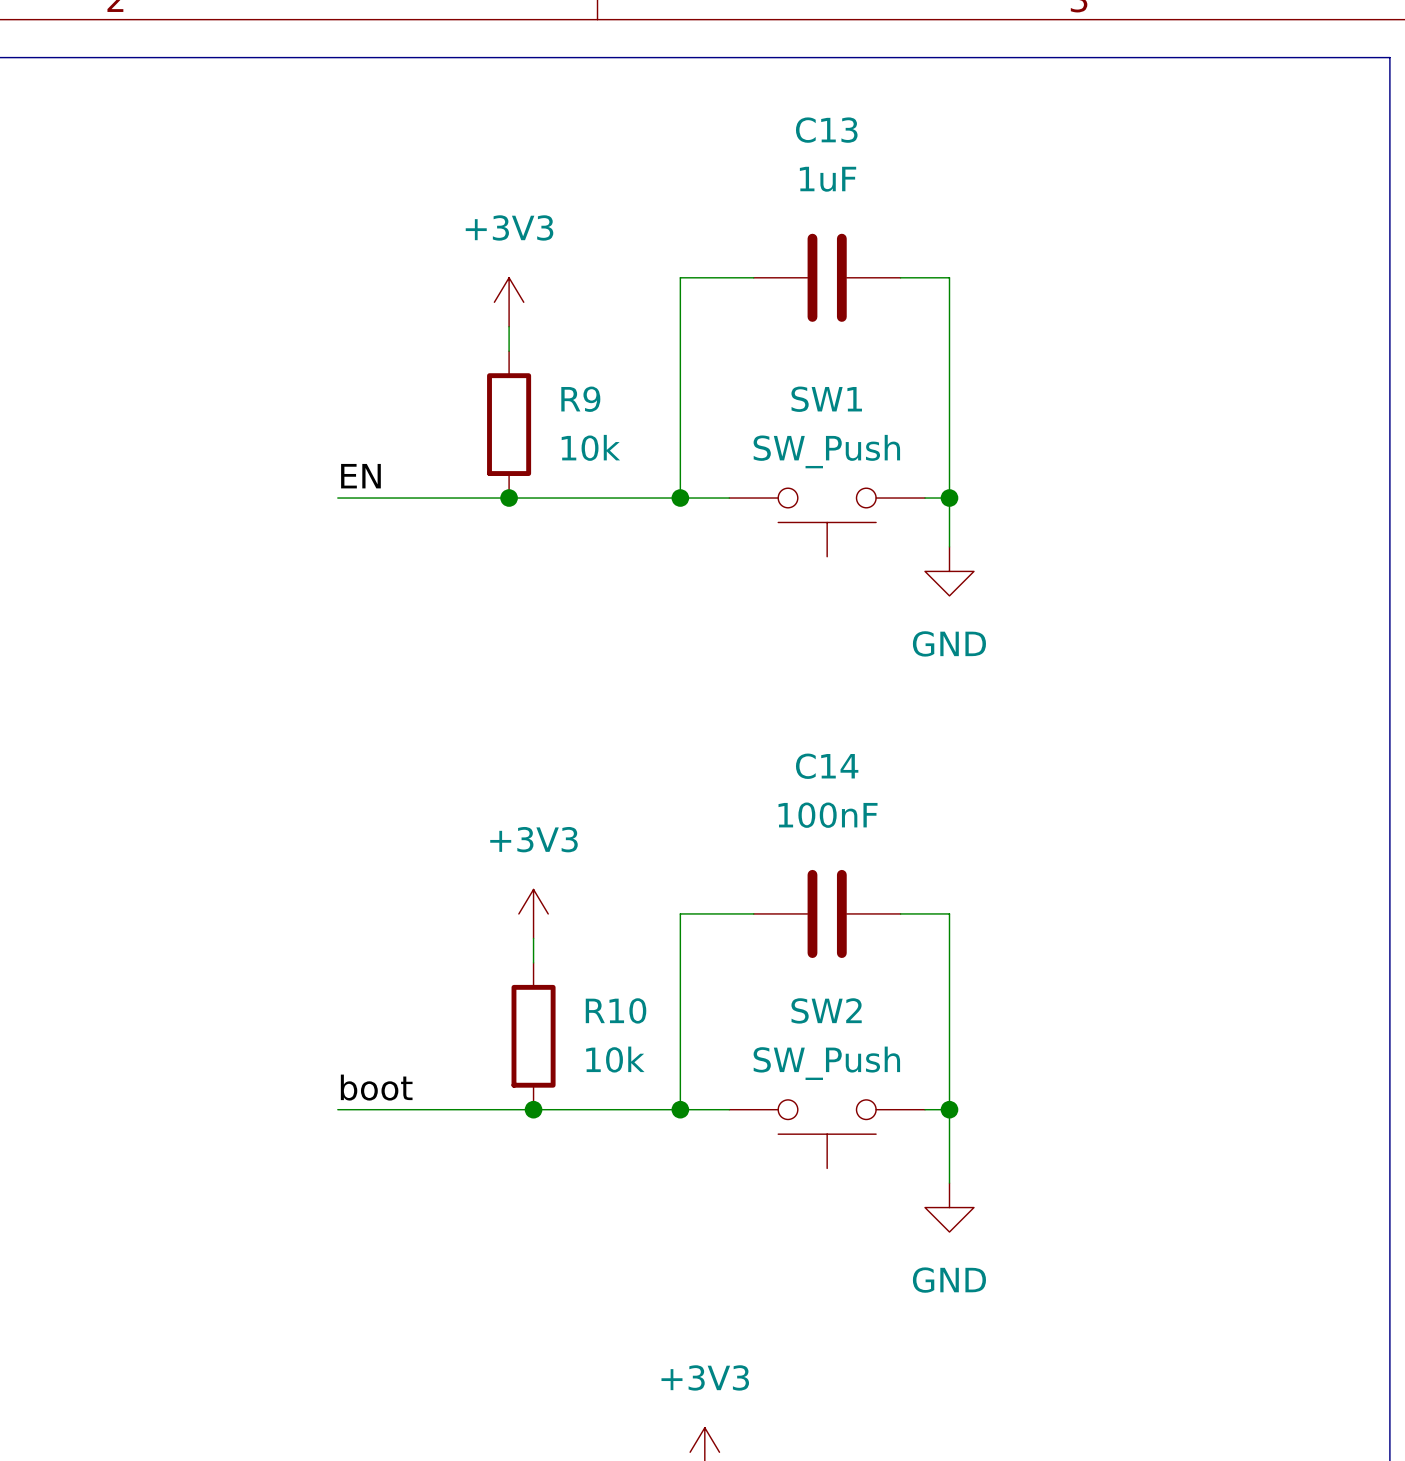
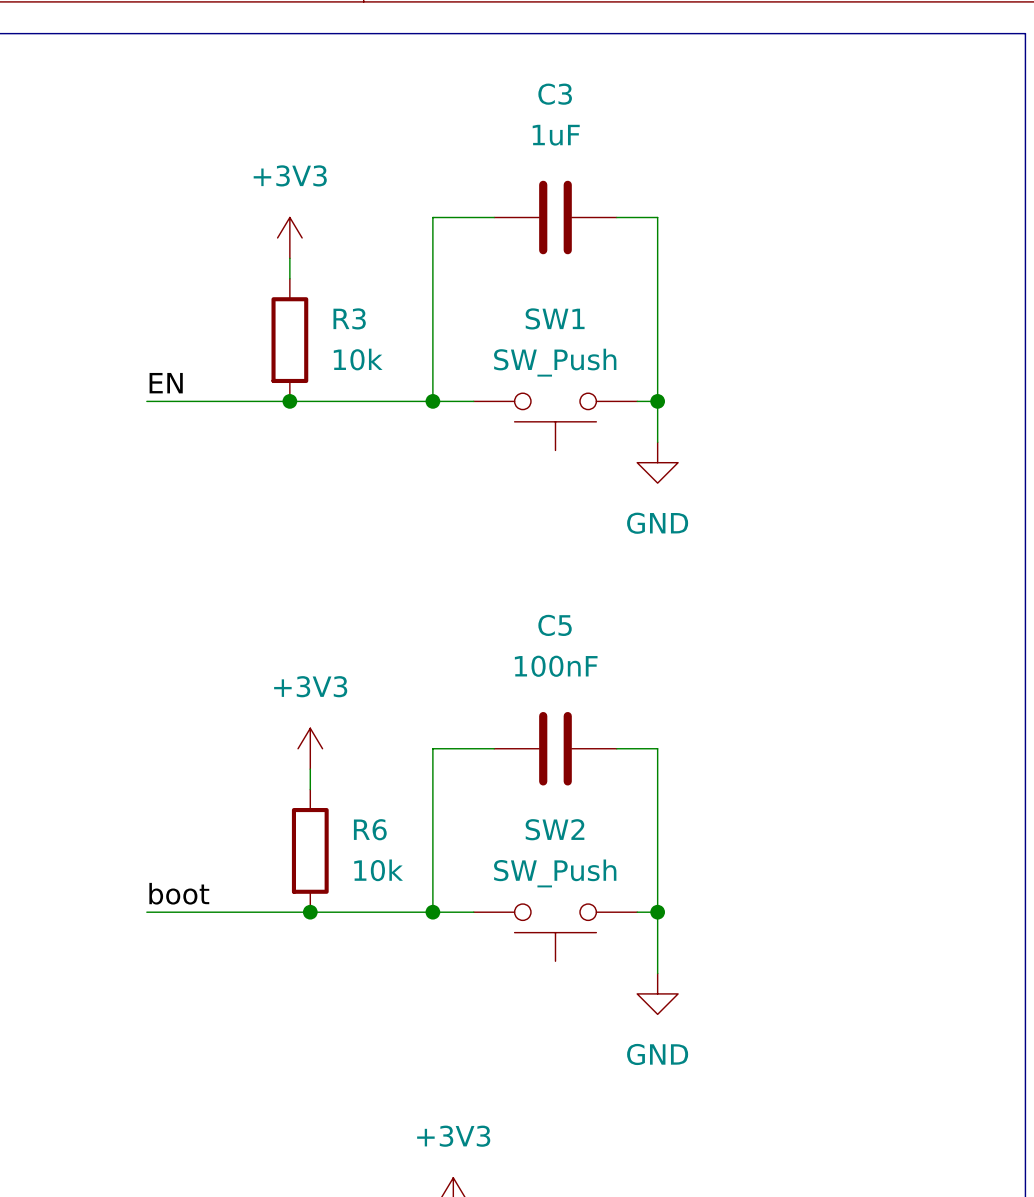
C13 name: C13 (826, 130) -> C3 (555, 94)
R9 name: R9 (580, 399) -> R3 (349, 318)
C14 name: C14 (827, 766) -> C5 (555, 625)
R10 name: R10 (616, 1010) -> R6 (370, 829)

